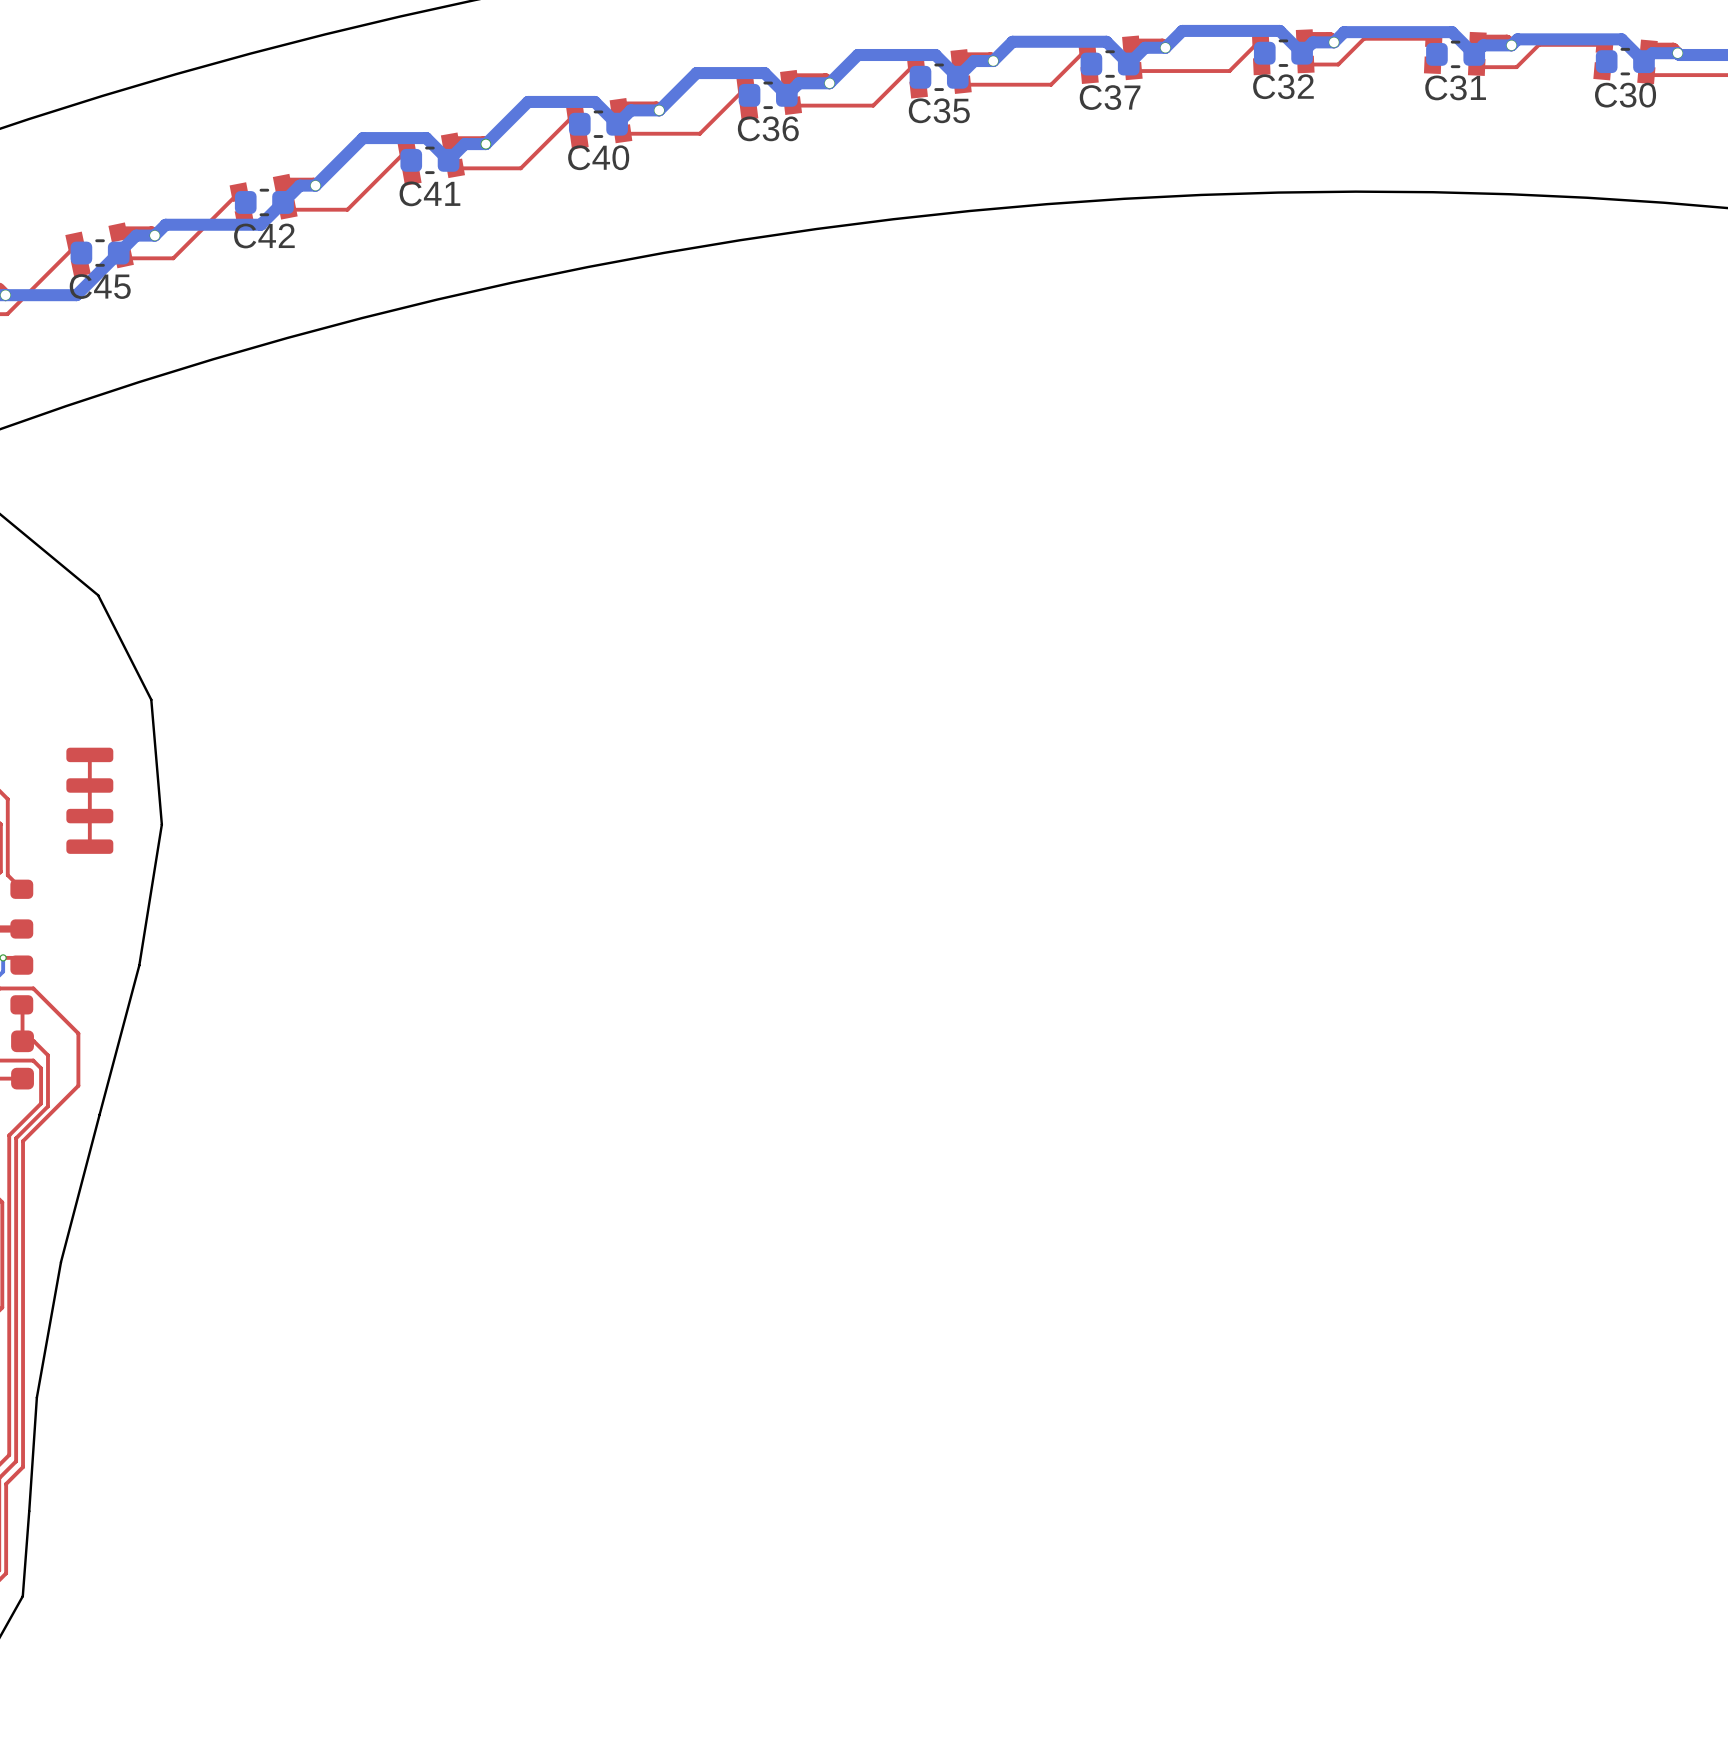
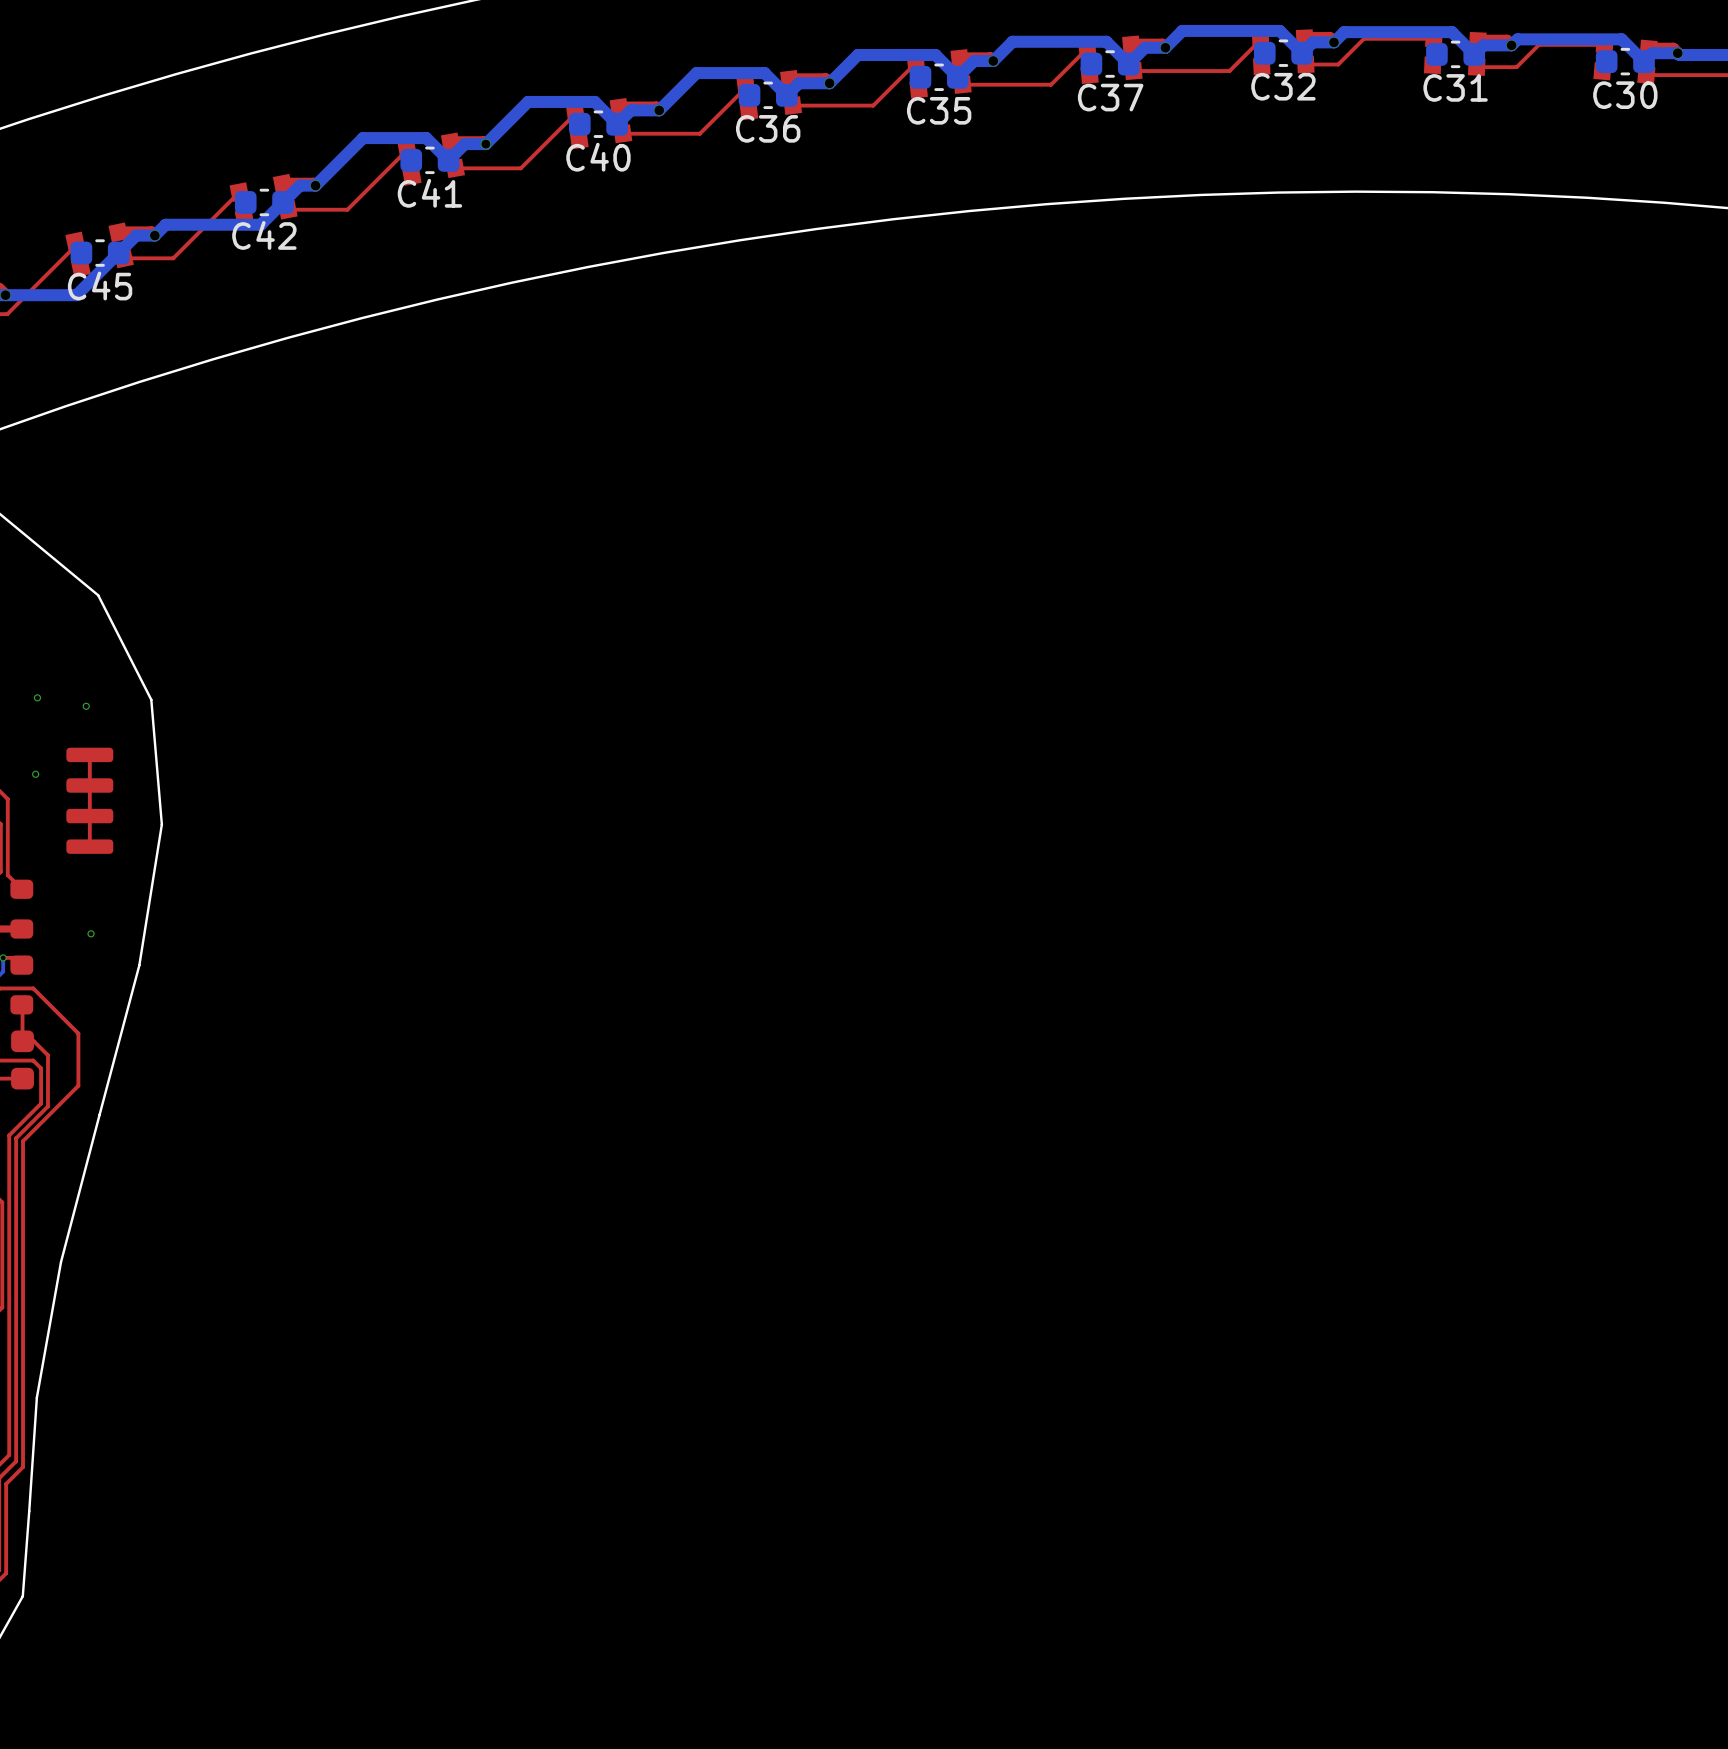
via: none -> (37, 697)
via: none -> (86, 706)
via: none -> (35, 774)
via: none -> (91, 933)

